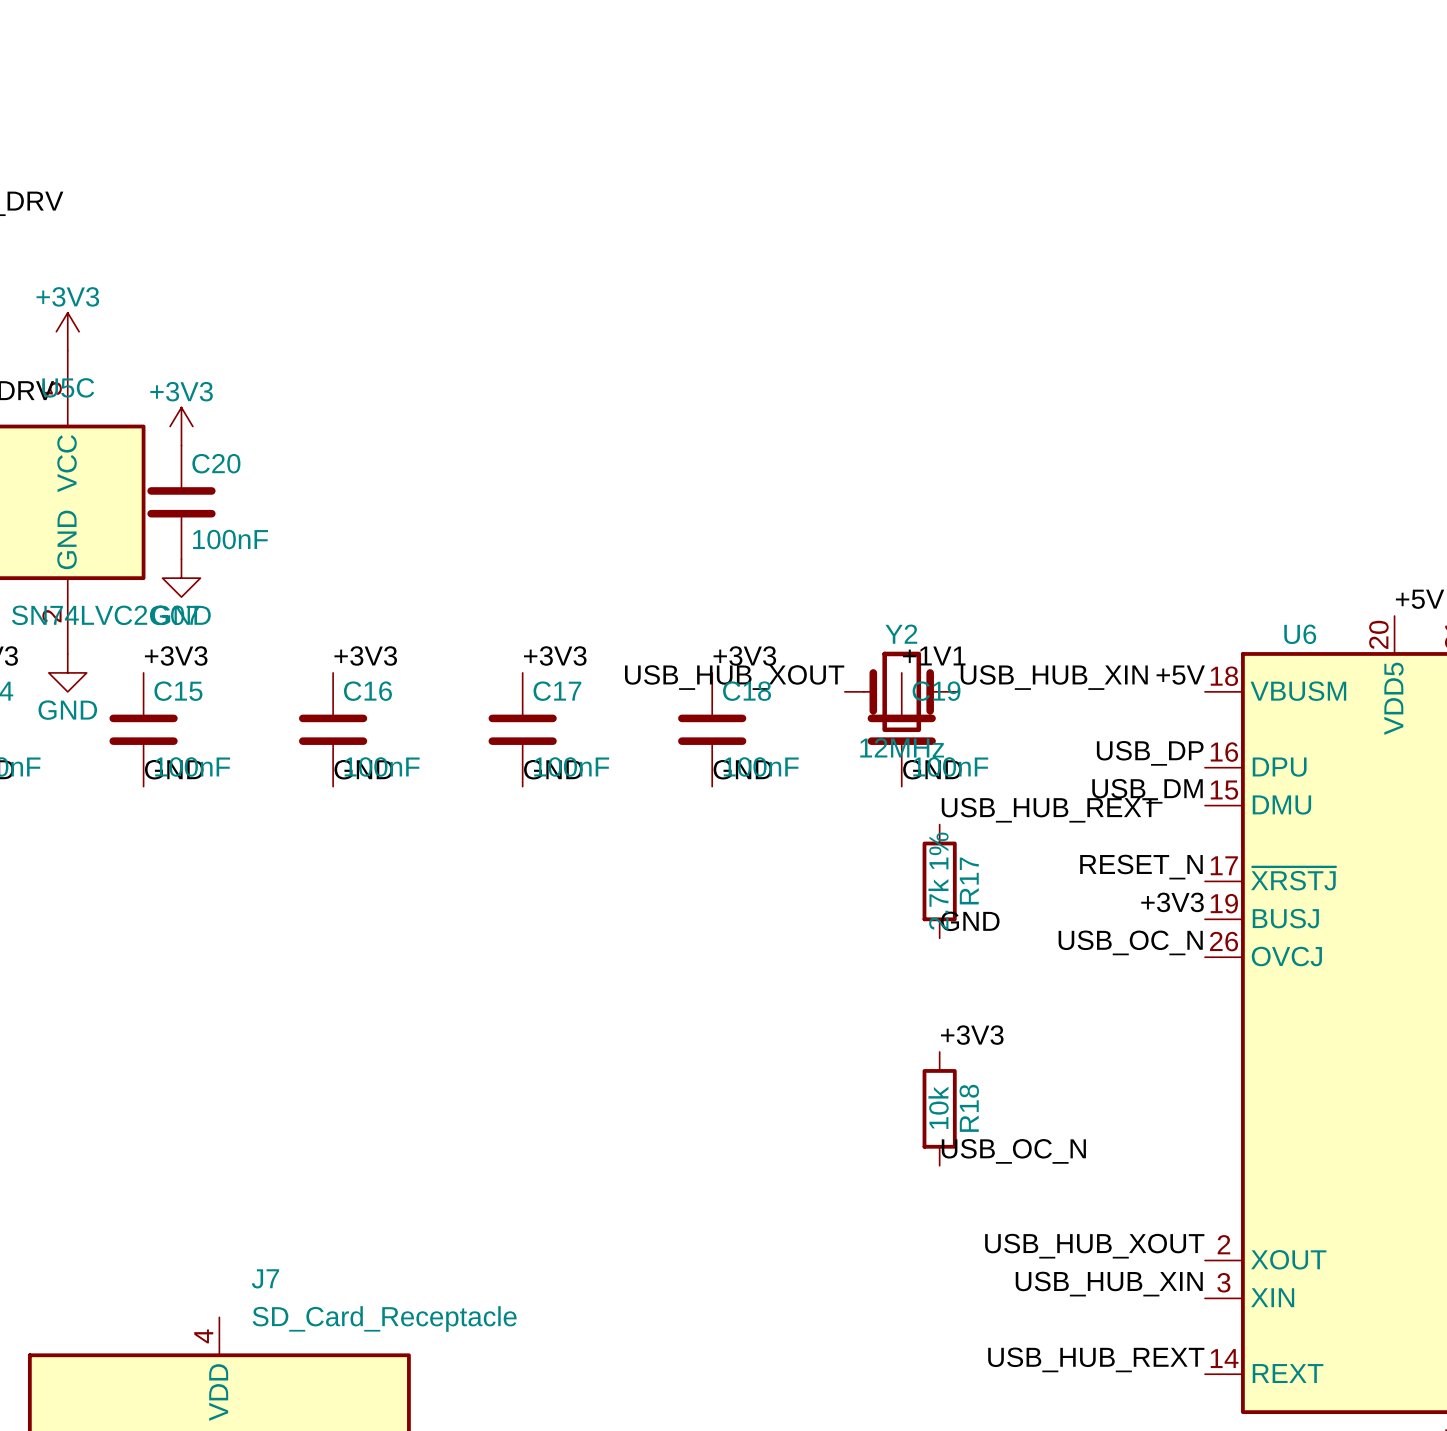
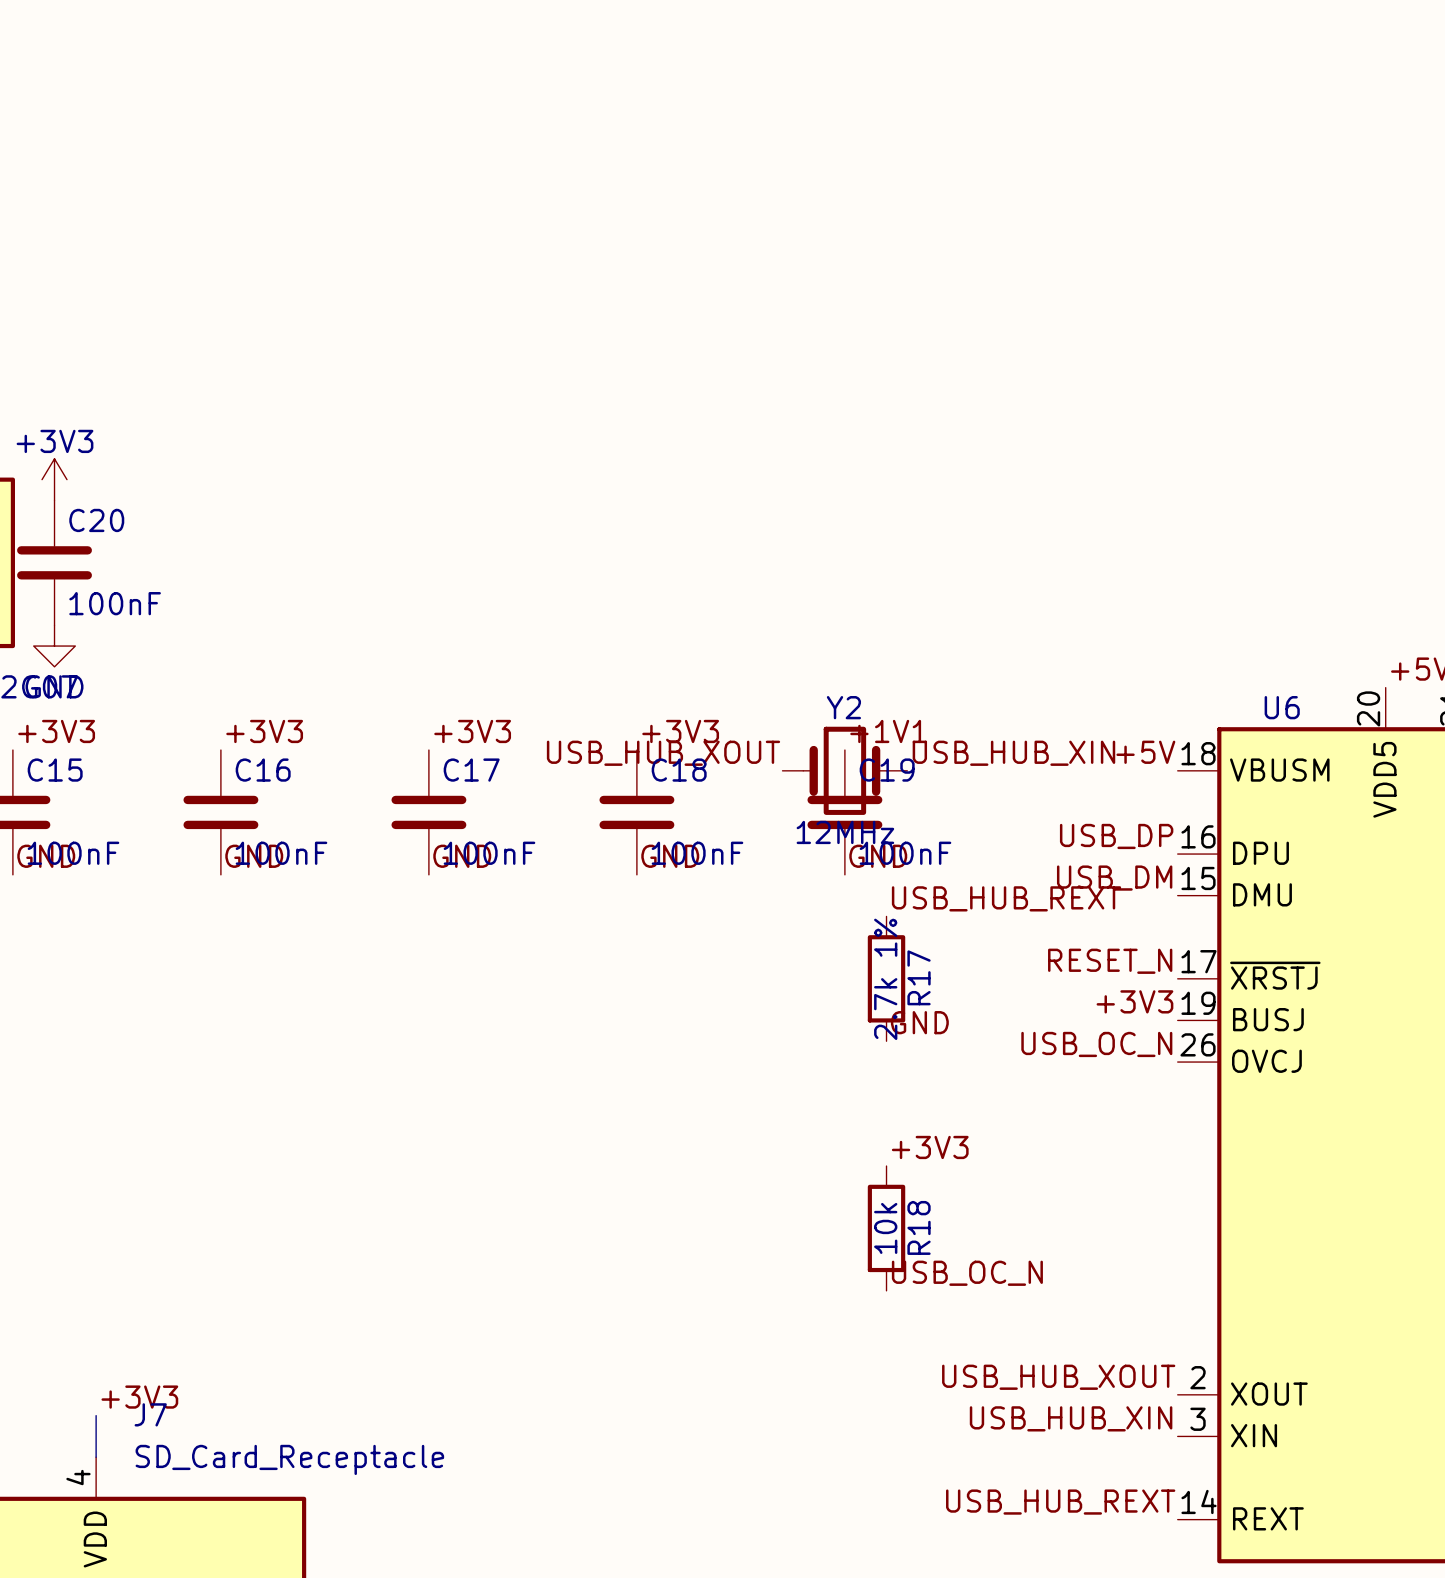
label: none -> +3V3 (139, 1397)
wire: none -> (96, 1415) (96, 1457)

